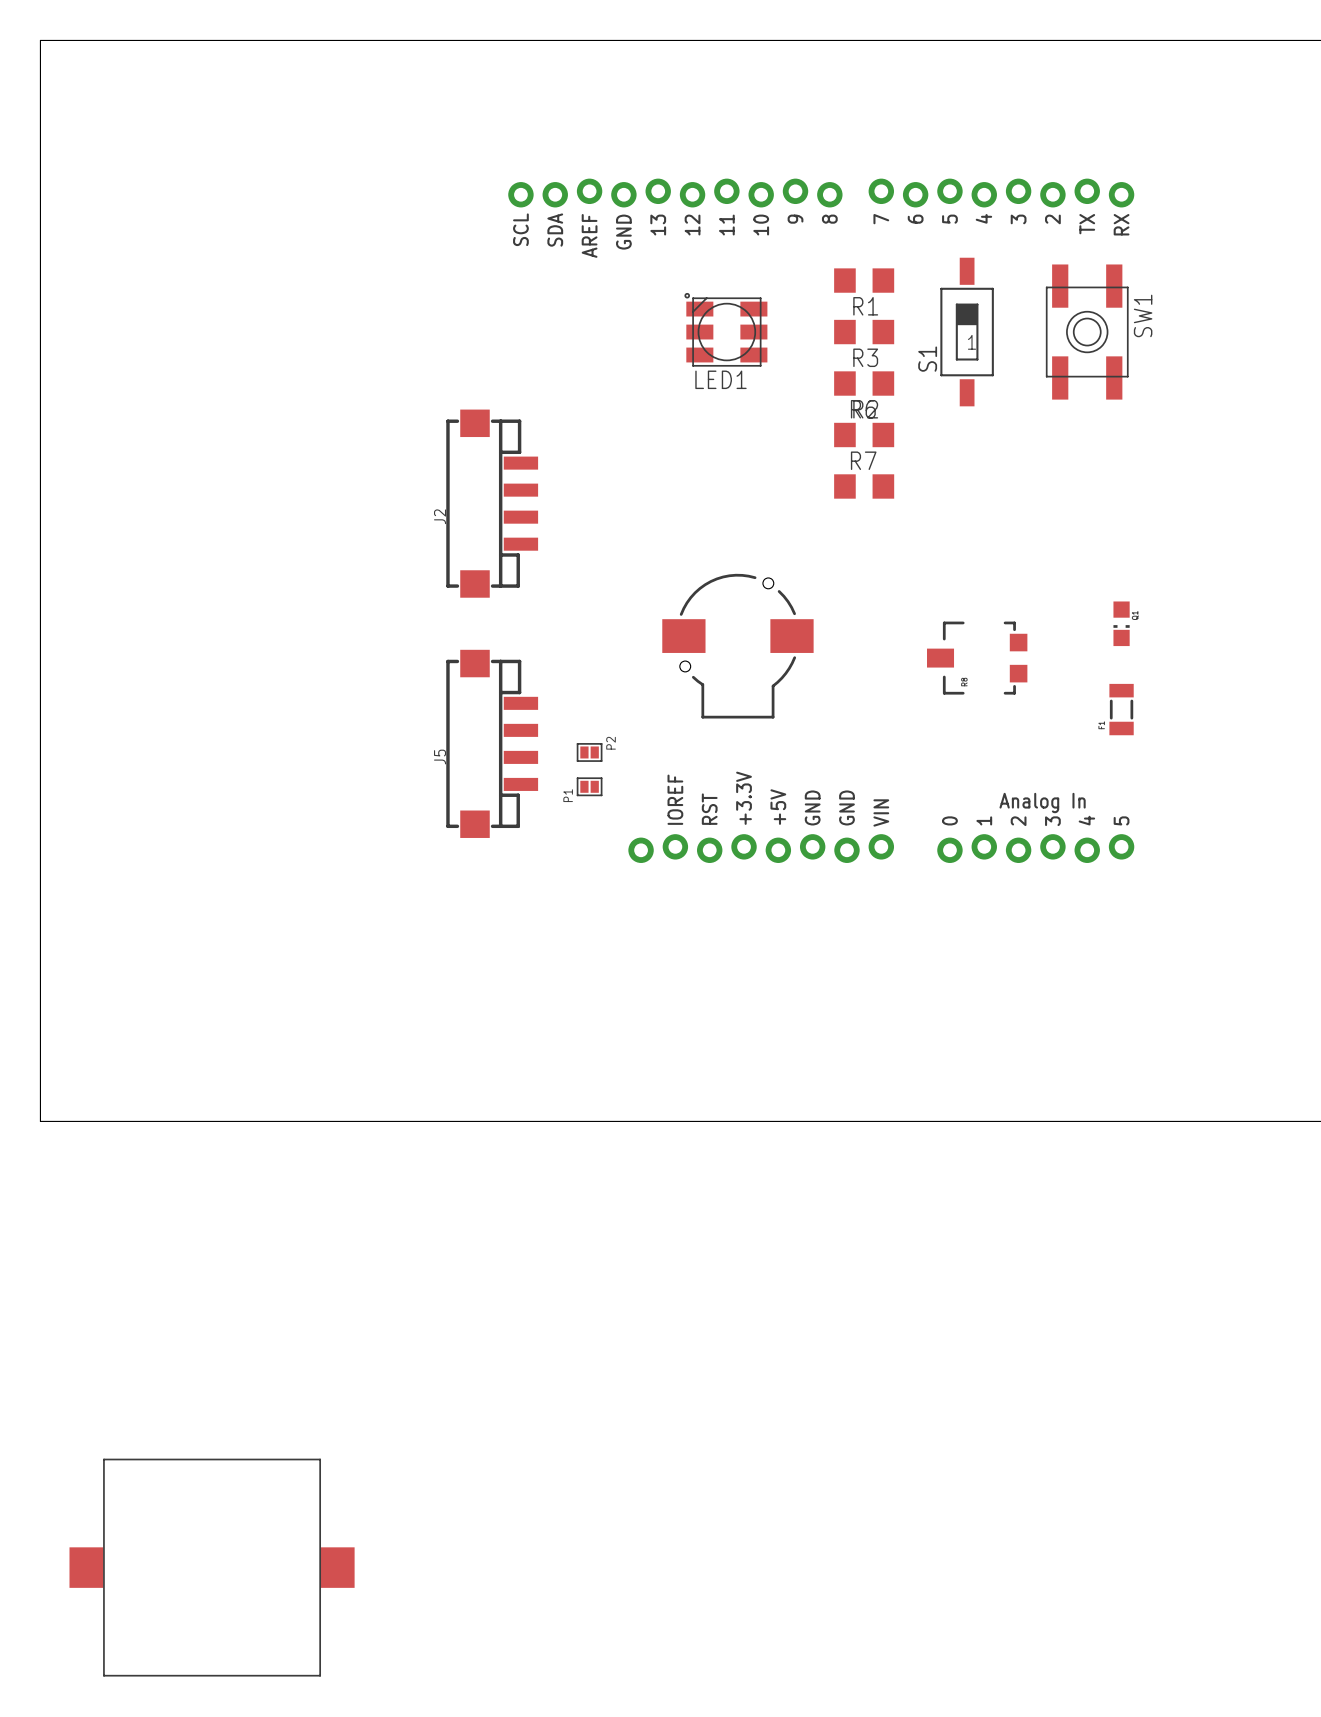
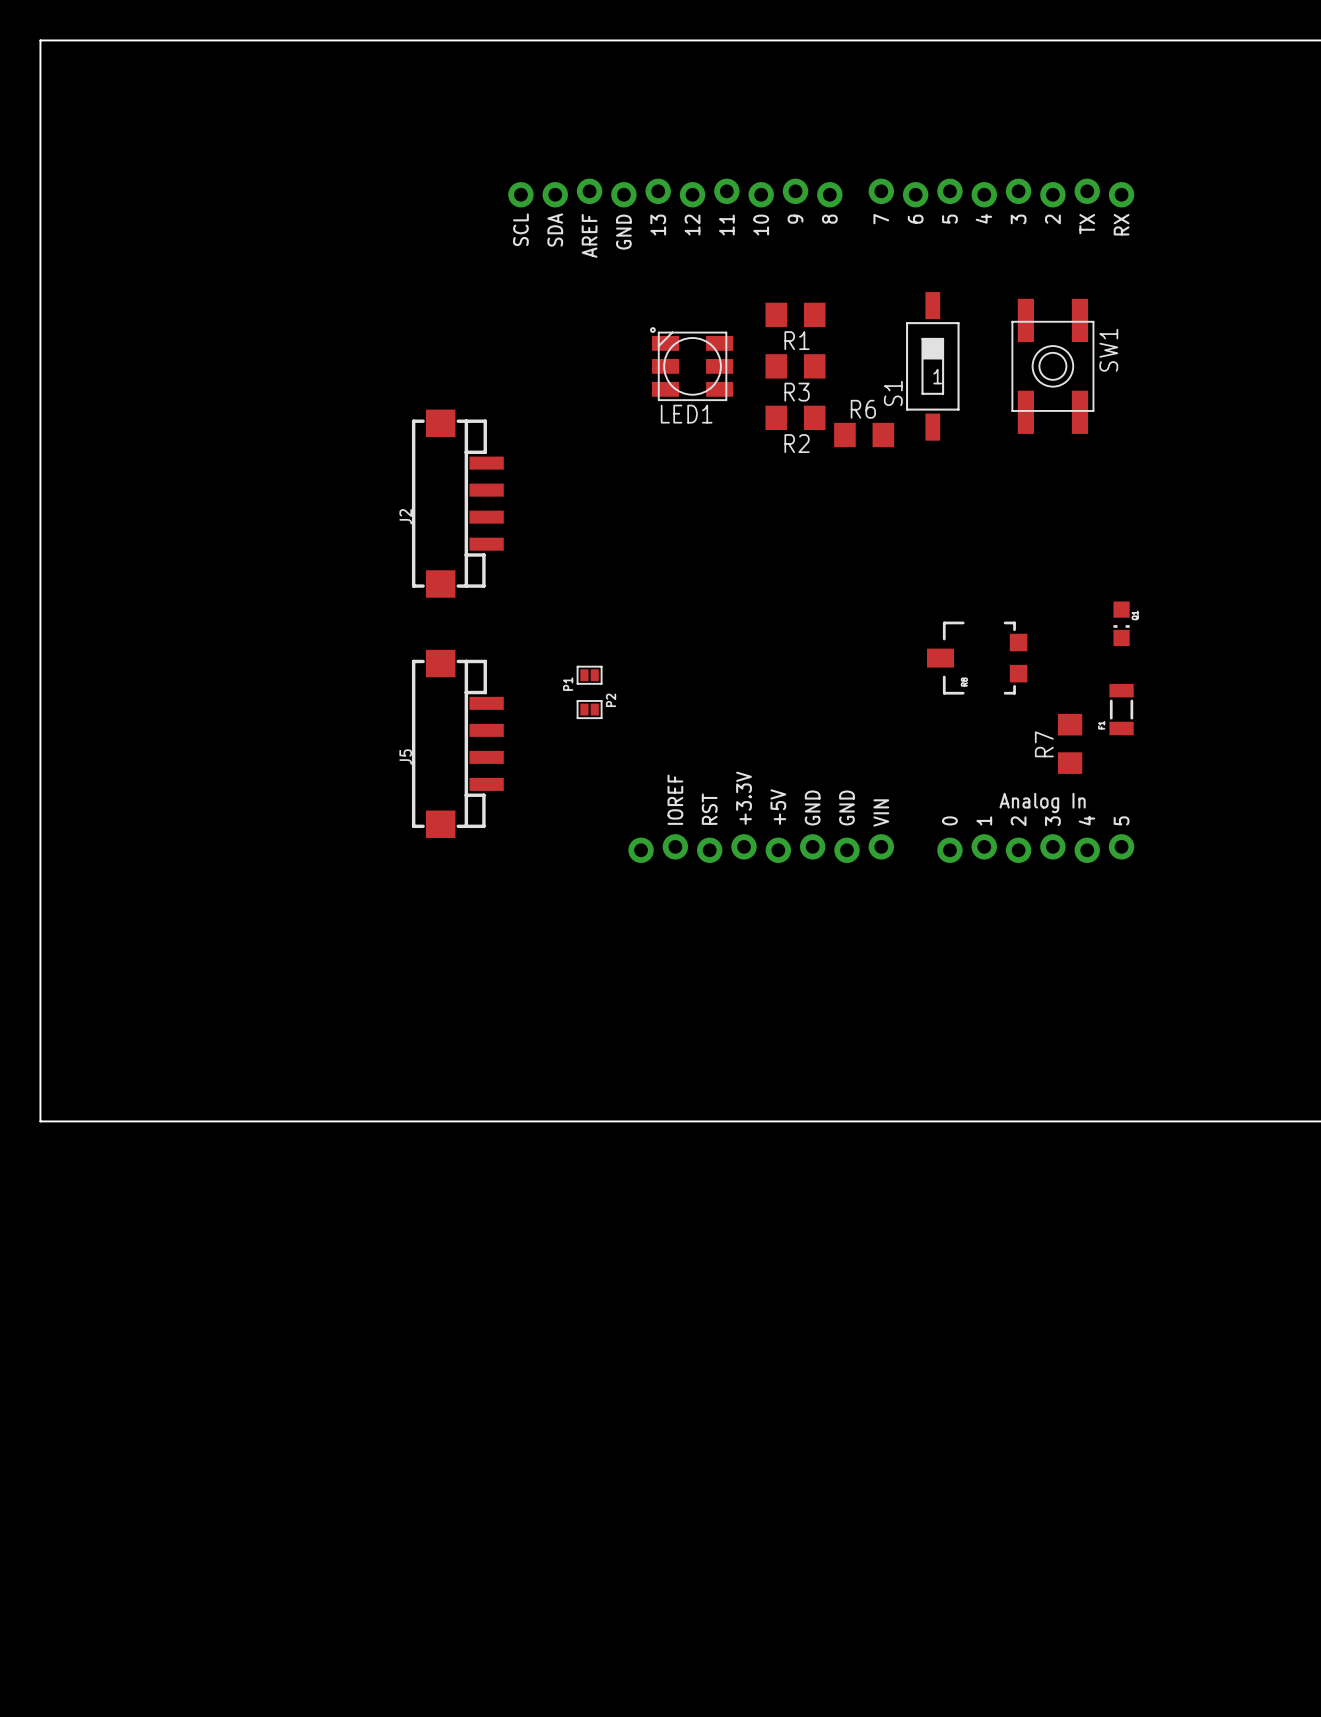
R1 position: (864, 280) -> (795, 314)
LED1 position: (725, 329) -> (691, 364)
R3 position: (864, 332) -> (795, 366)
S1 position: (967, 332) -> (932, 366)
SW1 position: (1087, 332) -> (1052, 366)
R2 position: (864, 383) -> (795, 417)
R7 name position: R7 (863, 460) -> R7 (1044, 744)
R7 rotation: 0° (864, 486) -> 90° clockwise (1070, 743)
R7 position: (864, 486) -> (1070, 743)
J2 position: (492, 503) -> (457, 503)
part: (737, 646) -> none
J5 position: (492, 743) -> (457, 743)
P2 position: (589, 752) -> (589, 709)
P1 position: (589, 786) -> (589, 675)
part: (212, 1567) -> none

